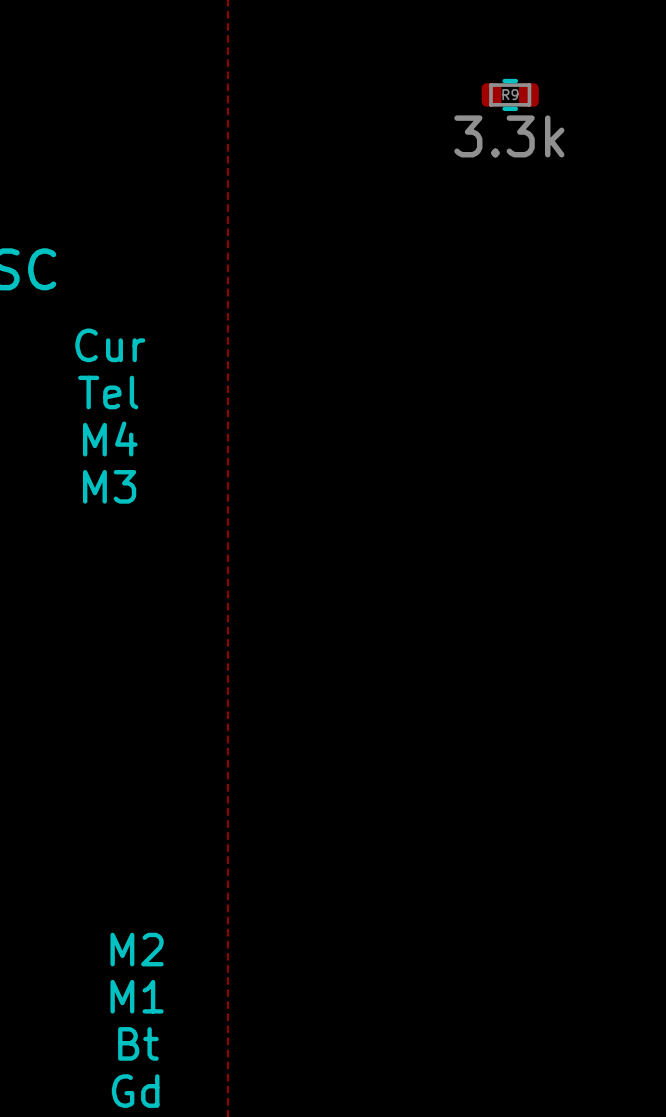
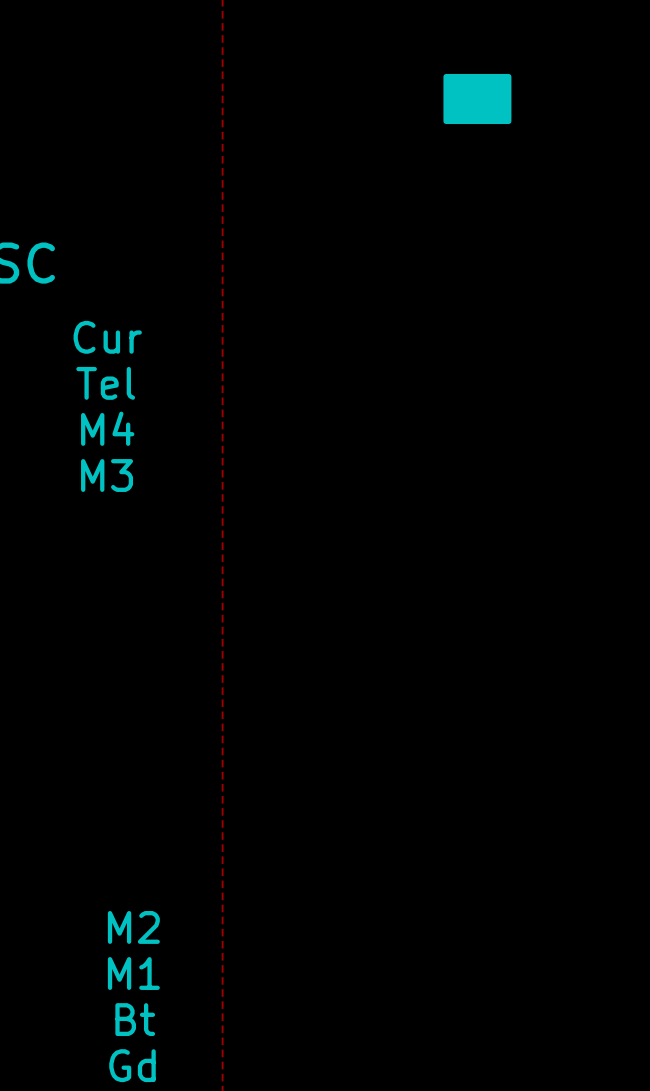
drawing: none -> [443, 73, 512, 125]
R9: 3.3k (510, 94) -> none

